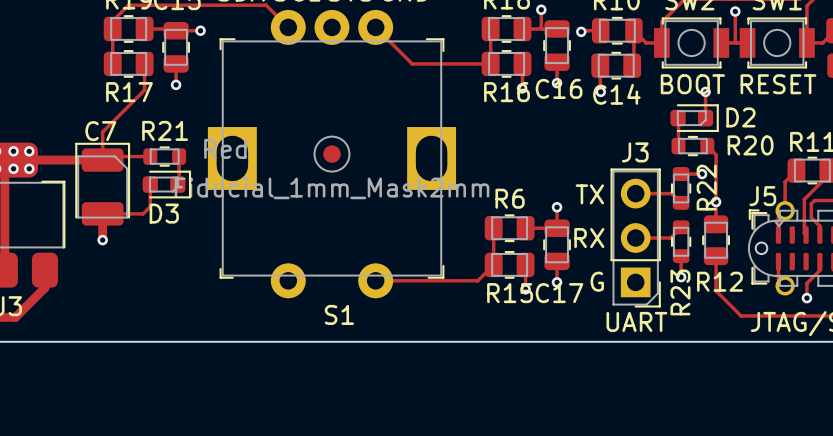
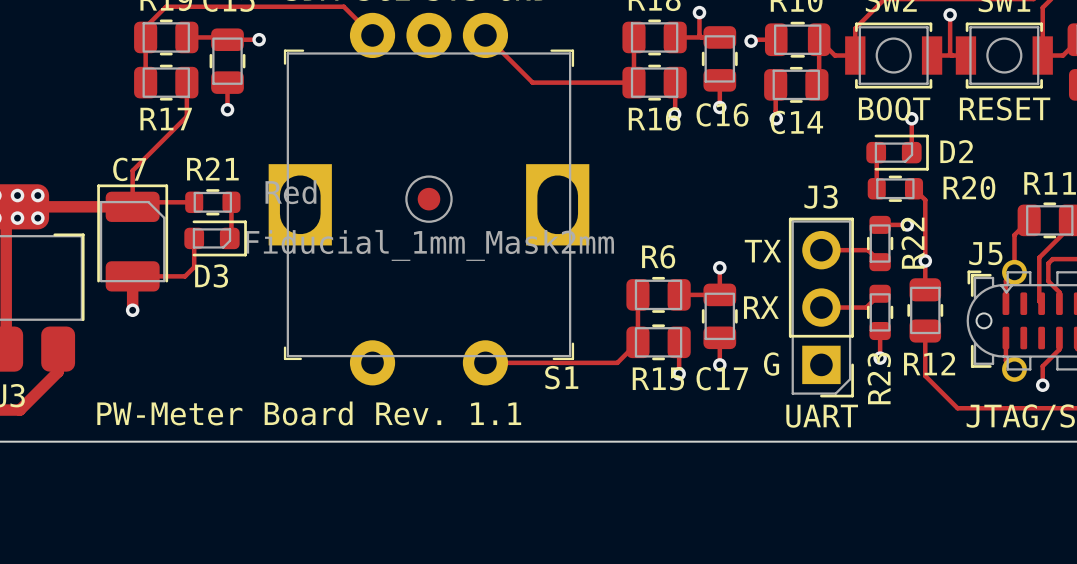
S1 name position: S1 (339, 314) -> S1 (561, 377)
text: none -> PW-Meter Board Rev. 1.1 (309, 413)

